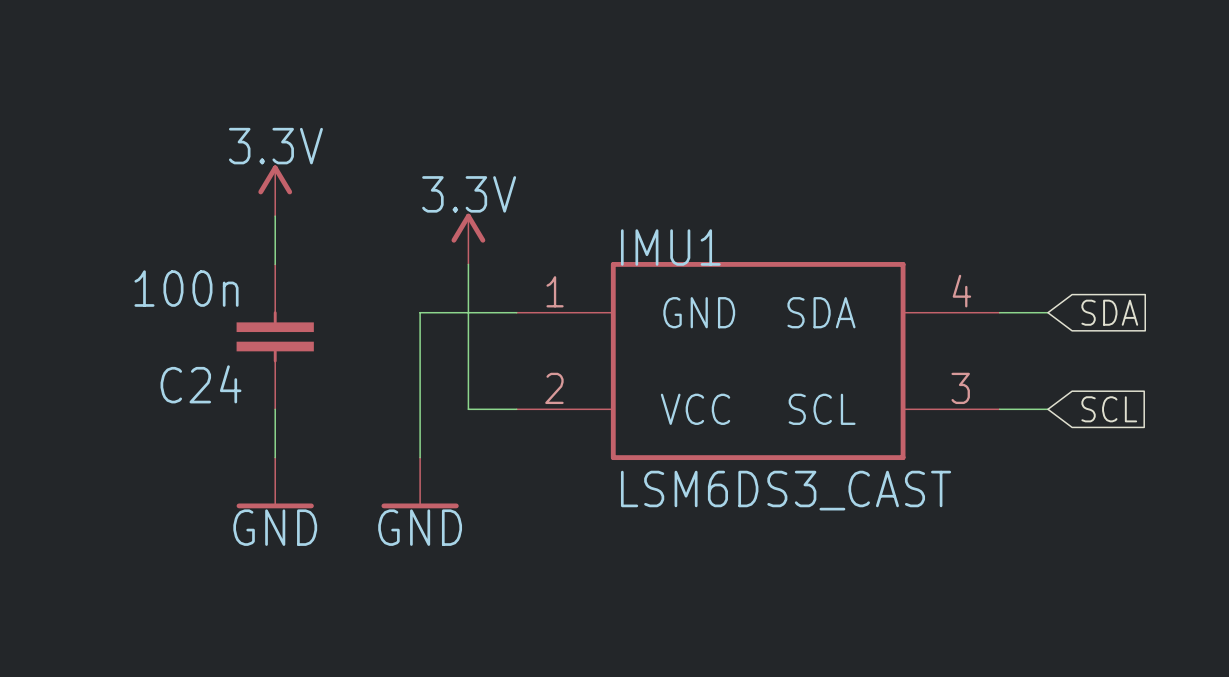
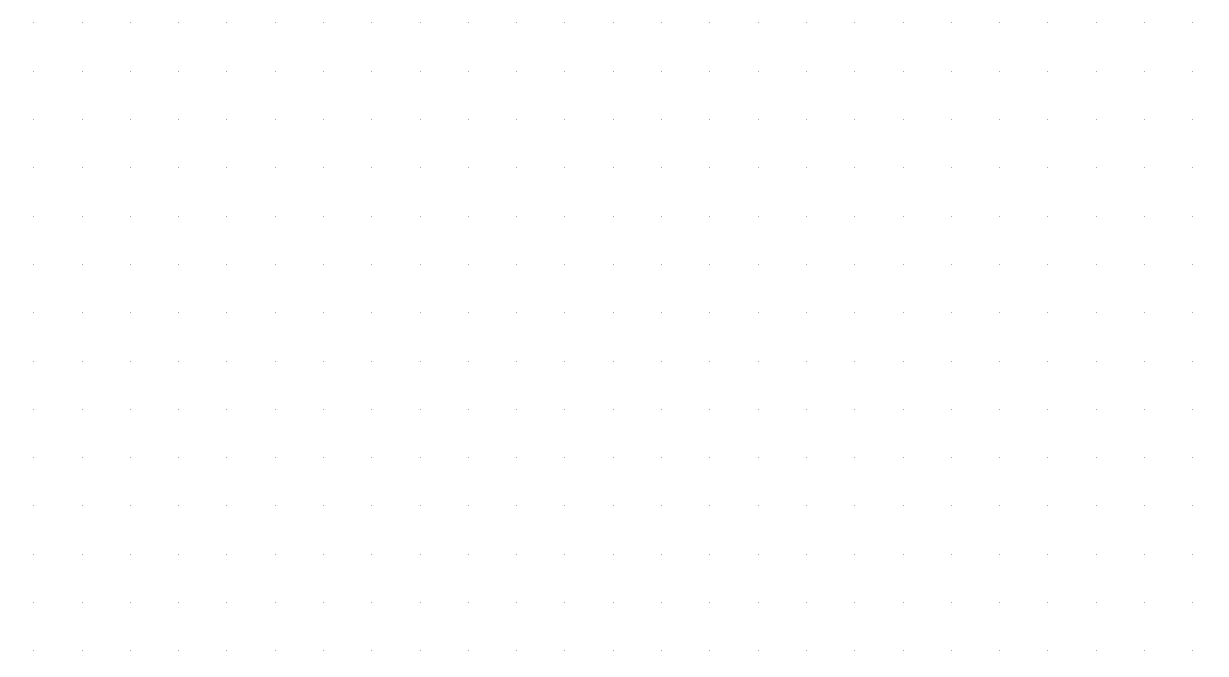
power symbol: 3.3V (275, 190) -> none
wire: (275, 216) (275, 264) -> none
power symbol: 3.3V (468, 239) -> none
wire: (468, 264) (468, 409) (516, 409) -> none
wire: (516, 312) (420, 312) (420, 457) -> none
wire: (999, 312) (1047, 312) -> none
global label: SDA (1109, 312) -> none
C24: 100n (275, 336) -> none
IMU1: LSM6DS3_CAST (758, 361) -> none
wire: (275, 409) (275, 457) -> none
wire: (999, 409) (1047, 409) -> none
global label: SCL (1109, 409) -> none
power symbol: GND (275, 482) -> none
power symbol: GND (420, 482) -> none

